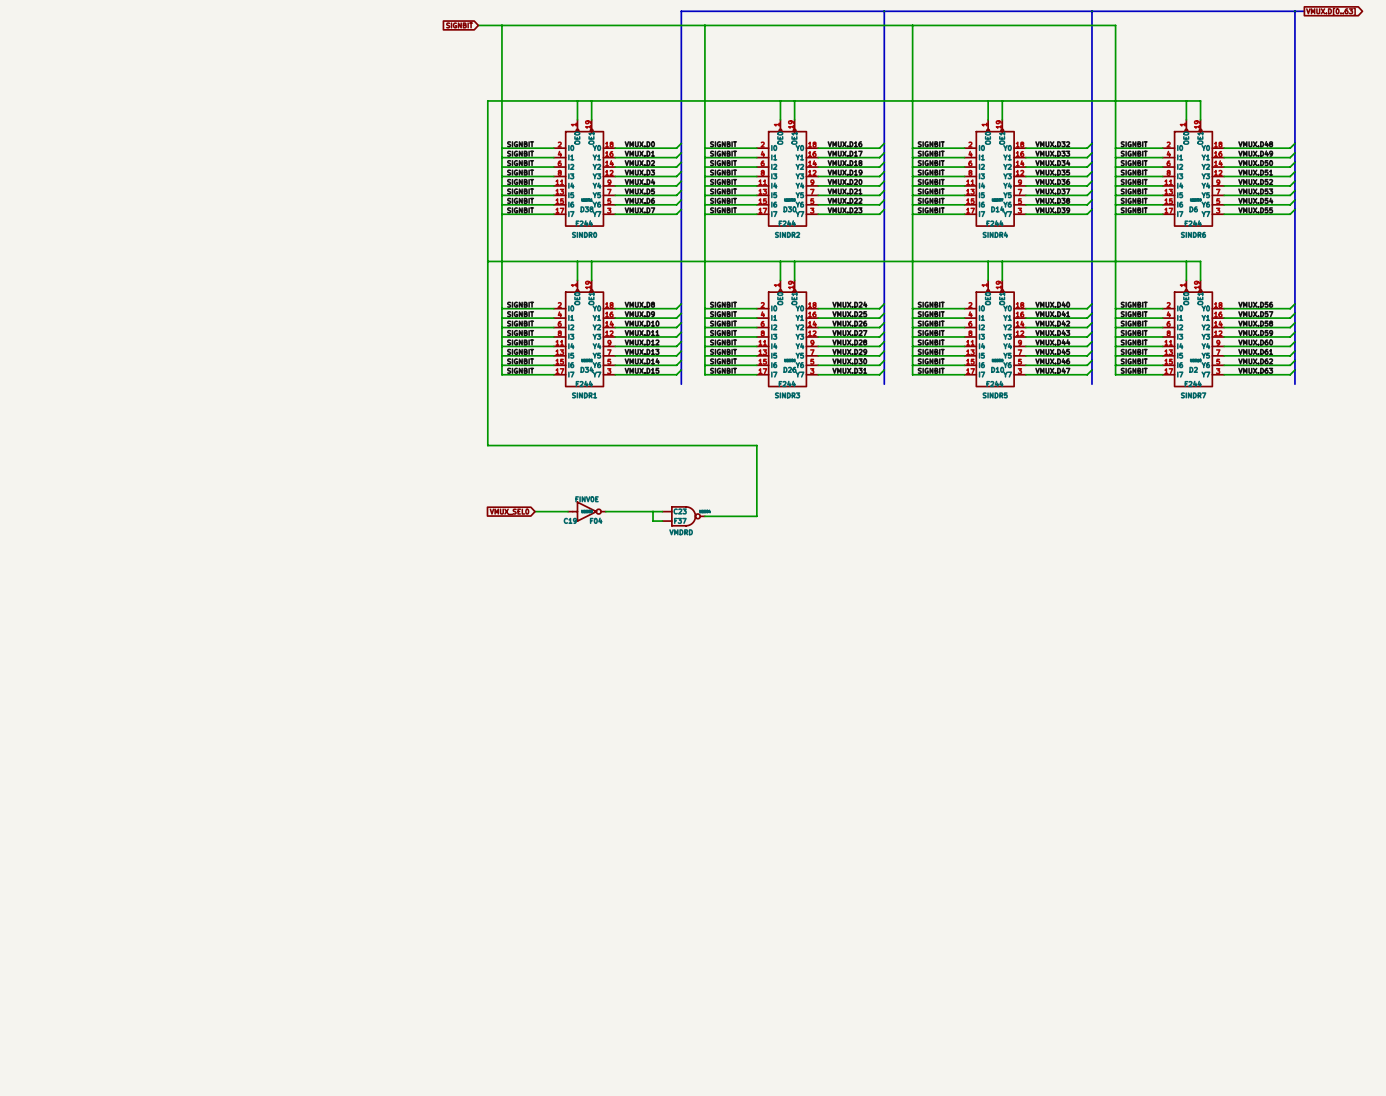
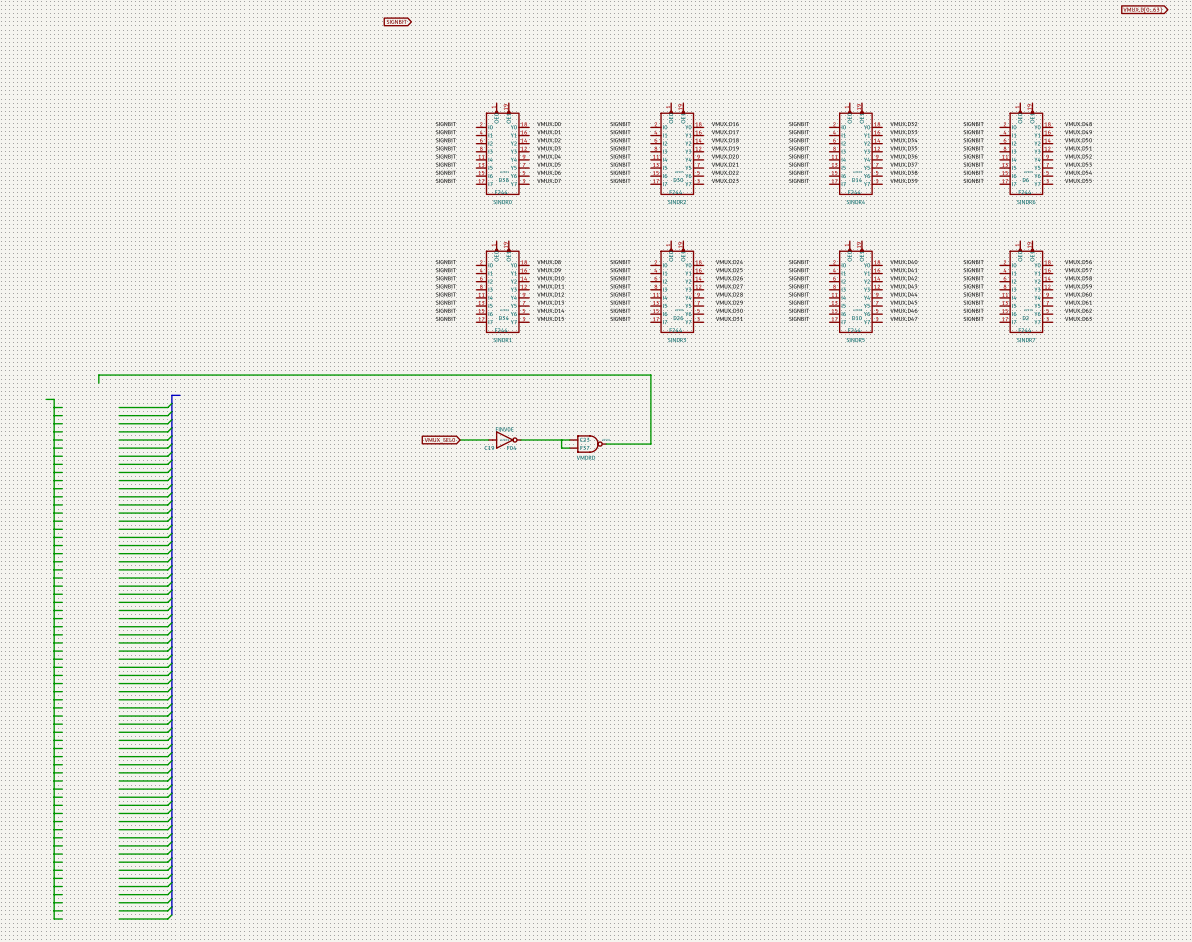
bus: (884, 11) (884, 384) -> none
junction: (884, 11) -> none
bus: (1091, 11) (1091, 384) -> none
junction: (1091, 11) -> none
bus: (1294, 11) (1294, 384) -> none
junction: (1294, 11) -> none
bus: (1304, 11) (681, 11) (681, 384) -> none
wire: (478, 25) (1115, 25) (1115, 374) (1162, 374) -> none
wire: (501, 25) (501, 374) (553, 374) -> none
wire: (704, 25) (704, 374) (756, 374) -> none
wire: (912, 25) (912, 374) (964, 374) -> none
wire: (577, 100) (577, 119) -> none
wire: (591, 100) (591, 119) -> none
wire: (780, 100) (780, 119) -> none
wire: (794, 100) (794, 119) -> none
wire: (988, 100) (988, 119) -> none
wire: (1002, 100) (1002, 119) -> none
wire: (1186, 100) (1186, 119) -> none
wire: (1200, 119) (1200, 100) (487, 100) (487, 445) (756, 445) -> (98, 383) (98, 375) (650, 375) (650, 383)
wire: (681, 143) (676, 148) (615, 148) -> none
wire: (884, 143) (879, 148) (818, 148) -> none
wire: (1091, 143) (1087, 148) (1025, 148) -> none
wire: (1294, 143) (1290, 148) (1224, 148) -> none
wire: (501, 148) (553, 148) -> none
wire: (704, 148) (756, 148) -> none
wire: (912, 148) (964, 148) -> none
wire: (1115, 148) (1162, 148) -> none
wire: (681, 152) (676, 157) (615, 157) -> none
wire: (884, 152) (879, 157) (818, 157) -> none
wire: (1091, 152) (1087, 157) (1025, 157) -> none
wire: (1294, 152) (1290, 157) (1224, 157) -> none
wire: (501, 157) (553, 157) -> none
wire: (704, 157) (756, 157) -> none
wire: (912, 157) (964, 157) -> none
wire: (1115, 157) (1162, 157) -> none
wire: (681, 162) (676, 167) (615, 167) -> none
wire: (884, 162) (879, 167) (818, 167) -> none
wire: (1091, 162) (1087, 167) (1025, 167) -> none
wire: (1294, 162) (1290, 167) (1224, 167) -> none
wire: (501, 167) (553, 167) -> none
wire: (704, 167) (756, 167) -> none
wire: (912, 167) (964, 167) -> none
wire: (1115, 167) (1162, 167) -> none
wire: (681, 171) (676, 176) (615, 176) -> none
wire: (884, 171) (879, 176) (818, 176) -> none
wire: (1091, 171) (1087, 176) (1025, 176) -> none
wire: (1294, 171) (1290, 176) (1224, 176) -> none
wire: (501, 176) (553, 176) -> none
wire: (704, 176) (756, 176) -> none
wire: (912, 176) (964, 176) -> none
wire: (1115, 176) (1162, 176) -> none
wire: (681, 181) (676, 185) (615, 185) -> none
wire: (884, 181) (879, 185) (818, 185) -> none
wire: (1091, 181) (1087, 185) (1025, 185) -> none
wire: (1294, 181) (1290, 185) (1224, 185) -> none
wire: (501, 185) (553, 185) -> none
wire: (704, 185) (756, 185) -> none
wire: (912, 185) (964, 185) -> none
wire: (1115, 185) (1162, 185) -> none
wire: (681, 190) (676, 195) (615, 195) -> none
wire: (884, 190) (879, 195) (818, 195) -> none
wire: (1091, 190) (1087, 195) (1025, 195) -> none
wire: (1294, 190) (1290, 195) (1224, 195) -> none
wire: (501, 195) (553, 195) -> none
wire: (704, 195) (756, 195) -> none
wire: (912, 195) (964, 195) -> none
wire: (1115, 195) (1162, 195) -> none
wire: (681, 200) (676, 204) (615, 204) -> none
wire: (884, 200) (879, 204) (818, 204) -> none
wire: (1091, 200) (1087, 204) (1025, 204) -> none
wire: (1294, 200) (1290, 204) (1224, 204) -> none
wire: (501, 204) (553, 204) -> none
wire: (704, 204) (756, 204) -> none
wire: (912, 204) (964, 204) -> none
wire: (1115, 204) (1162, 204) -> none
wire: (681, 209) (676, 214) (615, 214) -> none
wire: (884, 209) (879, 214) (818, 214) -> none
wire: (1091, 209) (1087, 214) (1025, 214) -> none
wire: (1294, 209) (1290, 214) (1224, 214) -> none
wire: (501, 214) (553, 214) -> none
wire: (704, 214) (756, 214) -> none
wire: (912, 214) (964, 214) -> none
wire: (1115, 214) (1162, 214) -> none
wire: (487, 261) (1200, 261) (1200, 280) -> none
wire: (577, 261) (577, 280) -> none
wire: (591, 261) (591, 280) -> none
wire: (780, 261) (780, 280) -> none
wire: (794, 261) (794, 280) -> none
wire: (988, 261) (988, 280) -> none
wire: (1002, 261) (1002, 280) -> none
wire: (1186, 261) (1186, 280) -> none
wire: (681, 303) (676, 308) (615, 308) -> none
wire: (884, 303) (879, 308) (818, 308) -> none
wire: (1091, 303) (1087, 308) (1025, 308) -> none
wire: (1294, 303) (1290, 308) (1224, 308) -> none
wire: (501, 308) (553, 308) -> none
wire: (704, 308) (756, 308) -> none
wire: (912, 308) (964, 308) -> none
wire: (1115, 308) (1162, 308) -> none
wire: (681, 313) (676, 318) (615, 318) -> none
wire: (884, 313) (879, 318) (818, 318) -> none
wire: (1091, 313) (1087, 318) (1025, 318) -> none
wire: (1294, 313) (1290, 318) (1224, 318) -> none
wire: (501, 318) (553, 318) -> none
wire: (704, 318) (756, 318) -> none
wire: (912, 318) (964, 318) -> none
wire: (1115, 318) (1162, 318) -> none
wire: (681, 322) (676, 327) (615, 327) -> none
wire: (884, 322) (879, 327) (818, 327) -> none
wire: (1091, 322) (1087, 327) (1025, 327) -> none
wire: (1294, 322) (1290, 327) (1224, 327) -> none
wire: (501, 327) (553, 327) -> none
wire: (704, 327) (756, 327) -> none
wire: (912, 327) (964, 327) -> none
wire: (1115, 327) (1162, 327) -> none
wire: (681, 332) (676, 336) (615, 336) -> none
wire: (884, 332) (879, 336) (818, 336) -> none
wire: (1091, 332) (1087, 336) (1025, 336) -> none
wire: (1294, 332) (1290, 336) (1224, 336) -> none
wire: (501, 336) (553, 336) -> none
wire: (704, 336) (756, 336) -> none
wire: (912, 336) (964, 336) -> none
wire: (1115, 336) (1162, 336) -> none
wire: (681, 341) (676, 346) (615, 346) -> none
wire: (884, 341) (879, 346) (818, 346) -> none
wire: (1091, 341) (1087, 346) (1025, 346) -> none
wire: (1294, 341) (1290, 346) (1224, 346) -> none
wire: (501, 346) (553, 346) -> none
wire: (704, 346) (756, 346) -> none
wire: (912, 346) (964, 346) -> none
wire: (1115, 346) (1162, 346) -> none
wire: (681, 351) (676, 355) (615, 355) -> none
wire: (884, 351) (879, 355) (818, 355) -> none
wire: (1091, 351) (1087, 355) (1025, 355) -> none
wire: (1294, 351) (1290, 355) (1224, 355) -> none
wire: (501, 355) (553, 355) -> none
wire: (704, 355) (756, 355) -> none
wire: (912, 355) (964, 355) -> none
wire: (1115, 355) (1162, 355) -> none
wire: (681, 360) (676, 365) (615, 365) -> none
wire: (884, 360) (879, 365) (818, 365) -> none
wire: (1091, 360) (1087, 365) (1025, 365) -> none
wire: (1294, 360) (1290, 365) (1224, 365) -> none
wire: (501, 365) (553, 365) -> none
wire: (704, 365) (756, 365) -> none
wire: (912, 365) (964, 365) -> none
wire: (1115, 365) (1162, 365) -> none
wire: (681, 370) (676, 374) (615, 374) -> none
wire: (884, 370) (879, 374) (818, 374) -> none
wire: (1091, 370) (1087, 374) (1025, 374) -> none
wire: (1294, 370) (1290, 374) (1224, 374) -> none
bus: none -> (180, 395) (171, 395) (171, 914)
wire: none -> (46, 399) (54, 399) (54, 919) (62, 919)
wire: none -> (171, 403) (167, 407) (119, 407)
wire: none -> (54, 407) (62, 407)
wire: none -> (171, 411) (167, 415) (119, 415)
wire: none -> (54, 415) (62, 415)
wire: none -> (171, 419) (167, 423) (119, 423)
wire: none -> (54, 423) (62, 423)
wire: none -> (171, 427) (167, 431) (119, 431)
wire: none -> (54, 431) (62, 431)
wire: none -> (171, 435) (167, 440) (119, 440)
wire: none -> (54, 440) (62, 440)
wire: none -> (171, 444) (167, 448) (119, 448)
wire: none -> (54, 448) (62, 448)
wire: none -> (171, 452) (167, 456) (119, 456)
wire: none -> (54, 456) (62, 456)
wire: none -> (171, 460) (167, 464) (119, 464)
wire: none -> (54, 464) (62, 464)
wire: none -> (171, 468) (167, 472) (119, 472)
wire: none -> (54, 472) (62, 472)
wire: none -> (171, 476) (167, 480) (119, 480)
wire: none -> (54, 480) (62, 480)
wire: none -> (171, 484) (167, 488) (119, 488)
wire: none -> (54, 488) (62, 488)
wire: none -> (171, 492) (167, 496) (119, 496)
wire: none -> (54, 496) (62, 496)
wire: none -> (171, 500) (167, 504) (119, 504)
wire: none -> (54, 504) (62, 504)
wire: none -> (171, 509) (167, 513) (119, 513)
wire: none -> (54, 513) (62, 513)
wire: none -> (171, 517) (167, 521) (119, 521)
wire: none -> (54, 521) (62, 521)
wire: none -> (171, 525) (167, 529) (119, 529)
wire: none -> (54, 529) (62, 529)
wire: none -> (171, 533) (167, 537) (119, 537)
wire: none -> (54, 537) (62, 537)
wire: none -> (171, 541) (167, 545) (119, 545)
wire: none -> (54, 545) (62, 545)
wire: none -> (171, 549) (167, 553) (119, 553)
wire: none -> (54, 553) (62, 553)
wire: none -> (171, 557) (167, 561) (119, 561)
wire: none -> (54, 561) (62, 561)
wire: none -> (171, 565) (167, 569) (119, 569)
wire: none -> (54, 569) (62, 569)
wire: none -> (171, 573) (167, 578) (119, 578)
wire: none -> (54, 578) (62, 578)
wire: none -> (171, 582) (167, 586) (119, 586)
wire: none -> (54, 586) (62, 586)
wire: none -> (171, 590) (167, 594) (119, 594)
wire: none -> (54, 594) (62, 594)
wire: none -> (171, 598) (167, 602) (119, 602)
wire: none -> (54, 602) (62, 602)
wire: none -> (171, 606) (167, 610) (119, 610)
wire: none -> (54, 610) (62, 610)
wire: none -> (171, 614) (167, 618) (119, 618)
wire: none -> (54, 618) (62, 618)
wire: none -> (171, 622) (167, 626) (119, 626)
wire: none -> (54, 626) (62, 626)
wire: none -> (171, 630) (167, 634) (119, 634)
wire: none -> (54, 634) (62, 634)
wire: none -> (171, 638) (167, 642) (119, 642)
wire: none -> (54, 642) (62, 642)
wire: none -> (171, 647) (167, 651) (119, 651)
wire: none -> (54, 651) (62, 651)
wire: none -> (171, 655) (167, 659) (119, 659)
wire: none -> (54, 659) (62, 659)
wire: none -> (171, 663) (167, 667) (119, 667)
wire: none -> (54, 667) (62, 667)
wire: none -> (171, 671) (167, 675) (119, 675)
wire: none -> (54, 675) (62, 675)
wire: none -> (171, 679) (167, 683) (119, 683)
wire: none -> (54, 683) (62, 683)
wire: none -> (171, 687) (167, 691) (119, 691)
wire: none -> (54, 691) (62, 691)
wire: none -> (171, 695) (167, 699) (119, 699)
wire: none -> (54, 699) (62, 699)
wire: none -> (171, 703) (167, 707) (119, 707)
wire: none -> (54, 707) (62, 707)
wire: none -> (171, 711) (167, 716) (119, 716)
wire: none -> (54, 716) (62, 716)
wire: none -> (171, 720) (167, 724) (119, 724)
wire: none -> (54, 724) (62, 724)
wire: none -> (171, 728) (167, 732) (119, 732)
wire: none -> (54, 732) (62, 732)
wire: none -> (171, 736) (167, 740) (119, 740)
wire: none -> (54, 740) (62, 740)
wire: none -> (171, 744) (167, 748) (119, 748)
wire: none -> (54, 748) (62, 748)
wire: none -> (171, 752) (167, 756) (119, 756)
wire: none -> (54, 756) (62, 756)
wire: none -> (171, 760) (167, 764) (119, 764)
wire: none -> (54, 764) (62, 764)
wire: none -> (171, 768) (167, 772) (119, 772)
wire: none -> (54, 772) (62, 772)
wire: none -> (171, 776) (167, 780) (119, 780)
wire: none -> (54, 780) (62, 780)
wire: none -> (171, 785) (167, 789) (119, 789)
wire: none -> (54, 789) (62, 789)
wire: none -> (171, 793) (167, 797) (119, 797)
wire: none -> (54, 797) (62, 797)
wire: none -> (171, 801) (167, 805) (119, 805)
wire: none -> (54, 805) (62, 805)
wire: none -> (171, 809) (167, 813) (119, 813)
wire: none -> (54, 813) (62, 813)
wire: none -> (171, 817) (167, 821) (119, 821)
wire: none -> (54, 821) (62, 821)
wire: none -> (171, 825) (167, 829) (119, 829)
wire: none -> (54, 829) (62, 829)
wire: none -> (171, 833) (167, 837) (119, 837)
wire: none -> (54, 837) (62, 837)
wire: none -> (171, 841) (167, 845) (119, 845)
wire: none -> (54, 845) (62, 845)
wire: none -> (171, 849) (167, 854) (119, 854)
wire: none -> (54, 854) (62, 854)
wire: none -> (171, 858) (167, 862) (119, 862)
wire: none -> (54, 862) (62, 862)
wire: none -> (171, 866) (167, 870) (119, 870)
wire: none -> (54, 870) (62, 870)
wire: none -> (171, 874) (167, 878) (119, 878)
wire: none -> (54, 878) (62, 878)
wire: none -> (171, 882) (167, 886) (119, 886)
wire: none -> (54, 886) (62, 886)
wire: none -> (171, 890) (167, 894) (119, 894)
wire: none -> (54, 894) (62, 894)
wire: none -> (171, 898) (167, 902) (119, 902)
wire: none -> (54, 902) (62, 902)
wire: none -> (171, 906) (167, 910) (119, 910)
wire: none -> (54, 910) (62, 910)
wire: none -> (171, 914) (167, 919) (119, 919)

